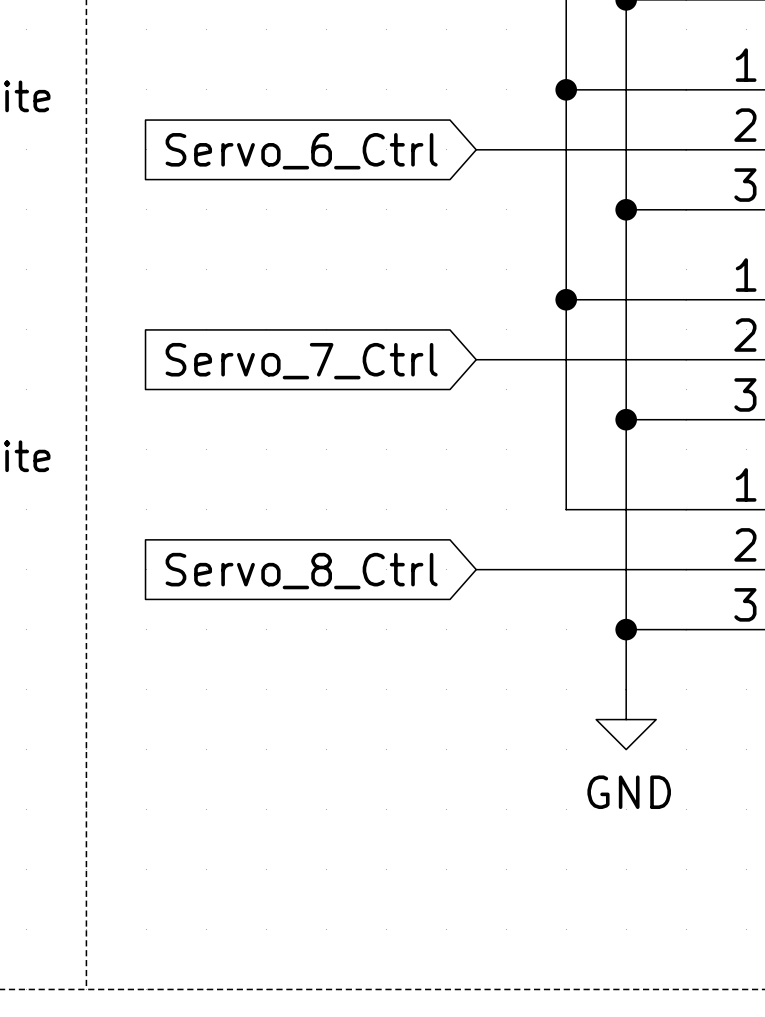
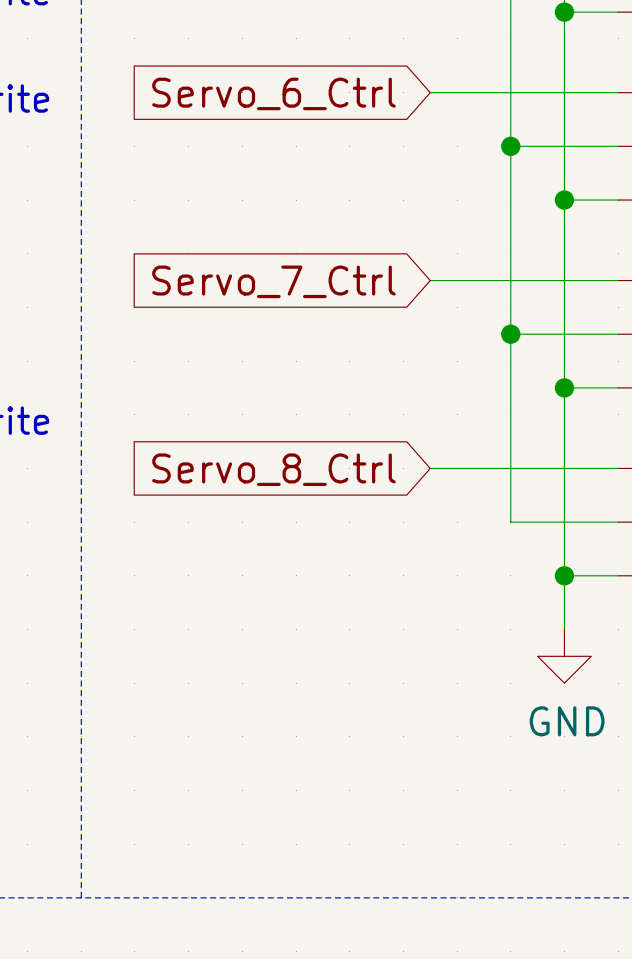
junction position: (566, 89) -> (510, 146)
wire: (476, 149) (566, 149) -> (430, 92) (510, 92)
global label position: Servo_6_Ctrl (301, 151) -> Servo_6_Ctrl (273, 93)
junction position: (566, 299) -> (510, 334)
wire: (476, 359) (566, 359) -> (430, 280) (510, 280)
global label position: Servo_7_Ctrl (301, 361) -> Servo_7_Ctrl (273, 281)
wire: (476, 569) (566, 569) -> (430, 468) (510, 468) (510, 522)
global label position: Servo_8_Ctrl (301, 571) -> Servo_8_Ctrl (273, 469)

